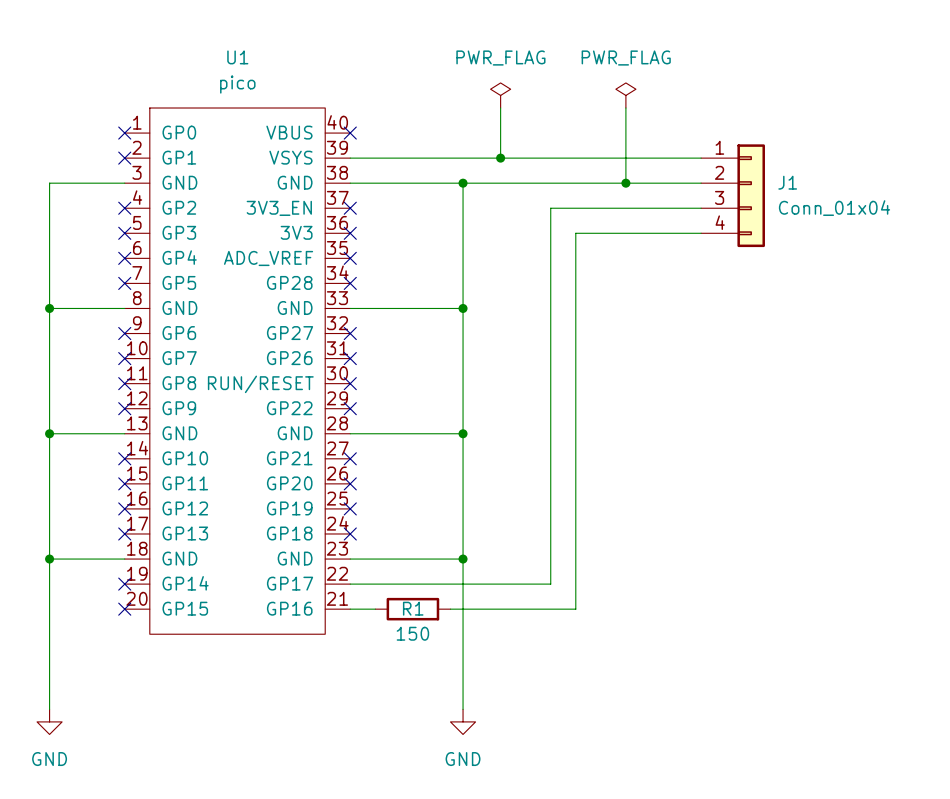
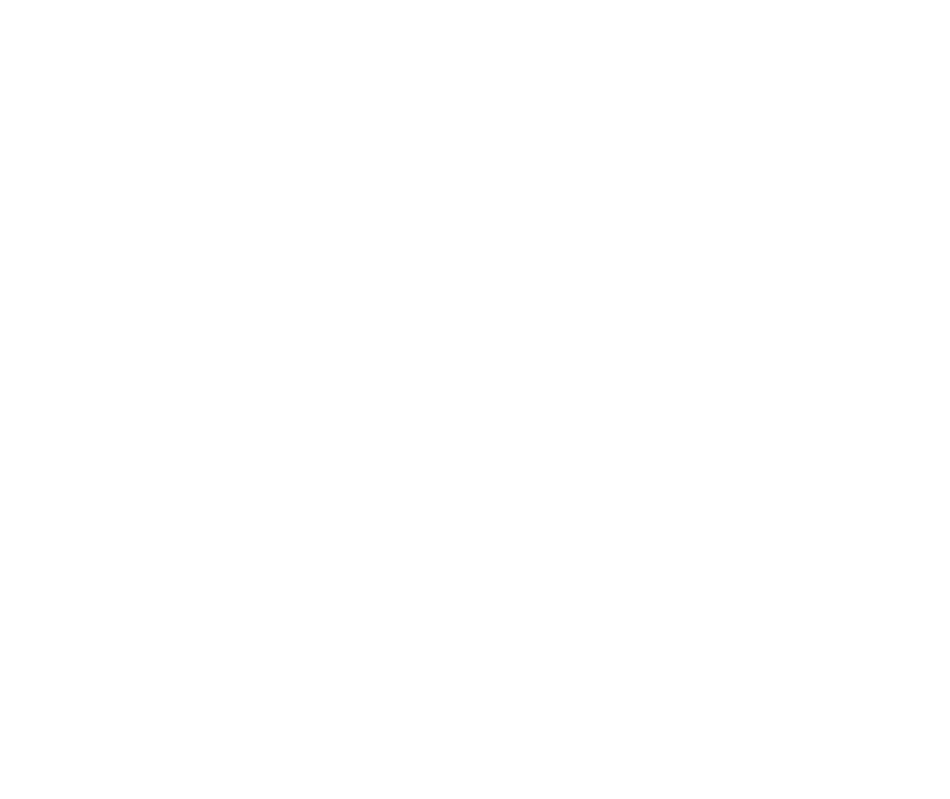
power symbol: PWR_FLAG (500, 95) -> none
power symbol: PWR_FLAG (625, 95) -> none
wire: (500, 108) (500, 158) -> none
wire: (625, 108) (625, 183) -> none
no-connect mark: (124, 133) -> none
no-connect mark: (350, 133) -> none
no-connect mark: (124, 158) -> none
wire: (350, 158) (701, 158) -> none
junction: (500, 158) -> none
wire: (124, 183) (49, 183) (49, 709) -> none
wire: (350, 183) (701, 183) -> none
wire: (463, 183) (463, 709) -> none
junction: (463, 183) -> none
junction: (625, 183) -> none
J1: Conn_01x04 (733, 195) -> none
no-connect mark: (124, 208) -> none
no-connect mark: (350, 208) -> none
wire: (701, 208) (550, 208) (550, 584) (350, 584) -> none
no-connect mark: (124, 233) -> none
no-connect mark: (350, 233) -> none
wire: (701, 233) (575, 233) (575, 609) (450, 609) -> none
no-connect mark: (124, 258) -> none
no-connect mark: (350, 258) -> none
no-connect mark: (124, 283) -> none
no-connect mark: (350, 283) -> none
wire: (49, 308) (124, 308) -> none
junction: (49, 308) -> none
wire: (350, 308) (463, 308) -> none
junction: (463, 308) -> none
no-connect mark: (124, 333) -> none
no-connect mark: (350, 333) -> none
no-connect mark: (124, 358) -> none
no-connect mark: (350, 358) -> none
U1: pico (237, 371) -> none
no-connect mark: (124, 383) -> none
no-connect mark: (350, 383) -> none
no-connect mark: (124, 408) -> none
no-connect mark: (350, 408) -> none
wire: (49, 433) (124, 433) -> none
junction: (49, 433) -> none
wire: (350, 433) (463, 433) -> none
junction: (463, 433) -> none
no-connect mark: (124, 458) -> none
no-connect mark: (350, 458) -> none
no-connect mark: (124, 483) -> none
no-connect mark: (350, 483) -> none
no-connect mark: (124, 508) -> none
no-connect mark: (350, 508) -> none
no-connect mark: (124, 533) -> none
no-connect mark: (350, 533) -> none
wire: (49, 559) (124, 559) -> none
junction: (49, 559) -> none
wire: (350, 559) (463, 559) -> none
junction: (463, 559) -> none
no-connect mark: (124, 584) -> none
no-connect mark: (124, 609) -> none
wire: (350, 609) (375, 609) -> none
R1: 150 (412, 609) -> none
power symbol: GND (49, 721) -> none
power symbol: GND (463, 721) -> none

